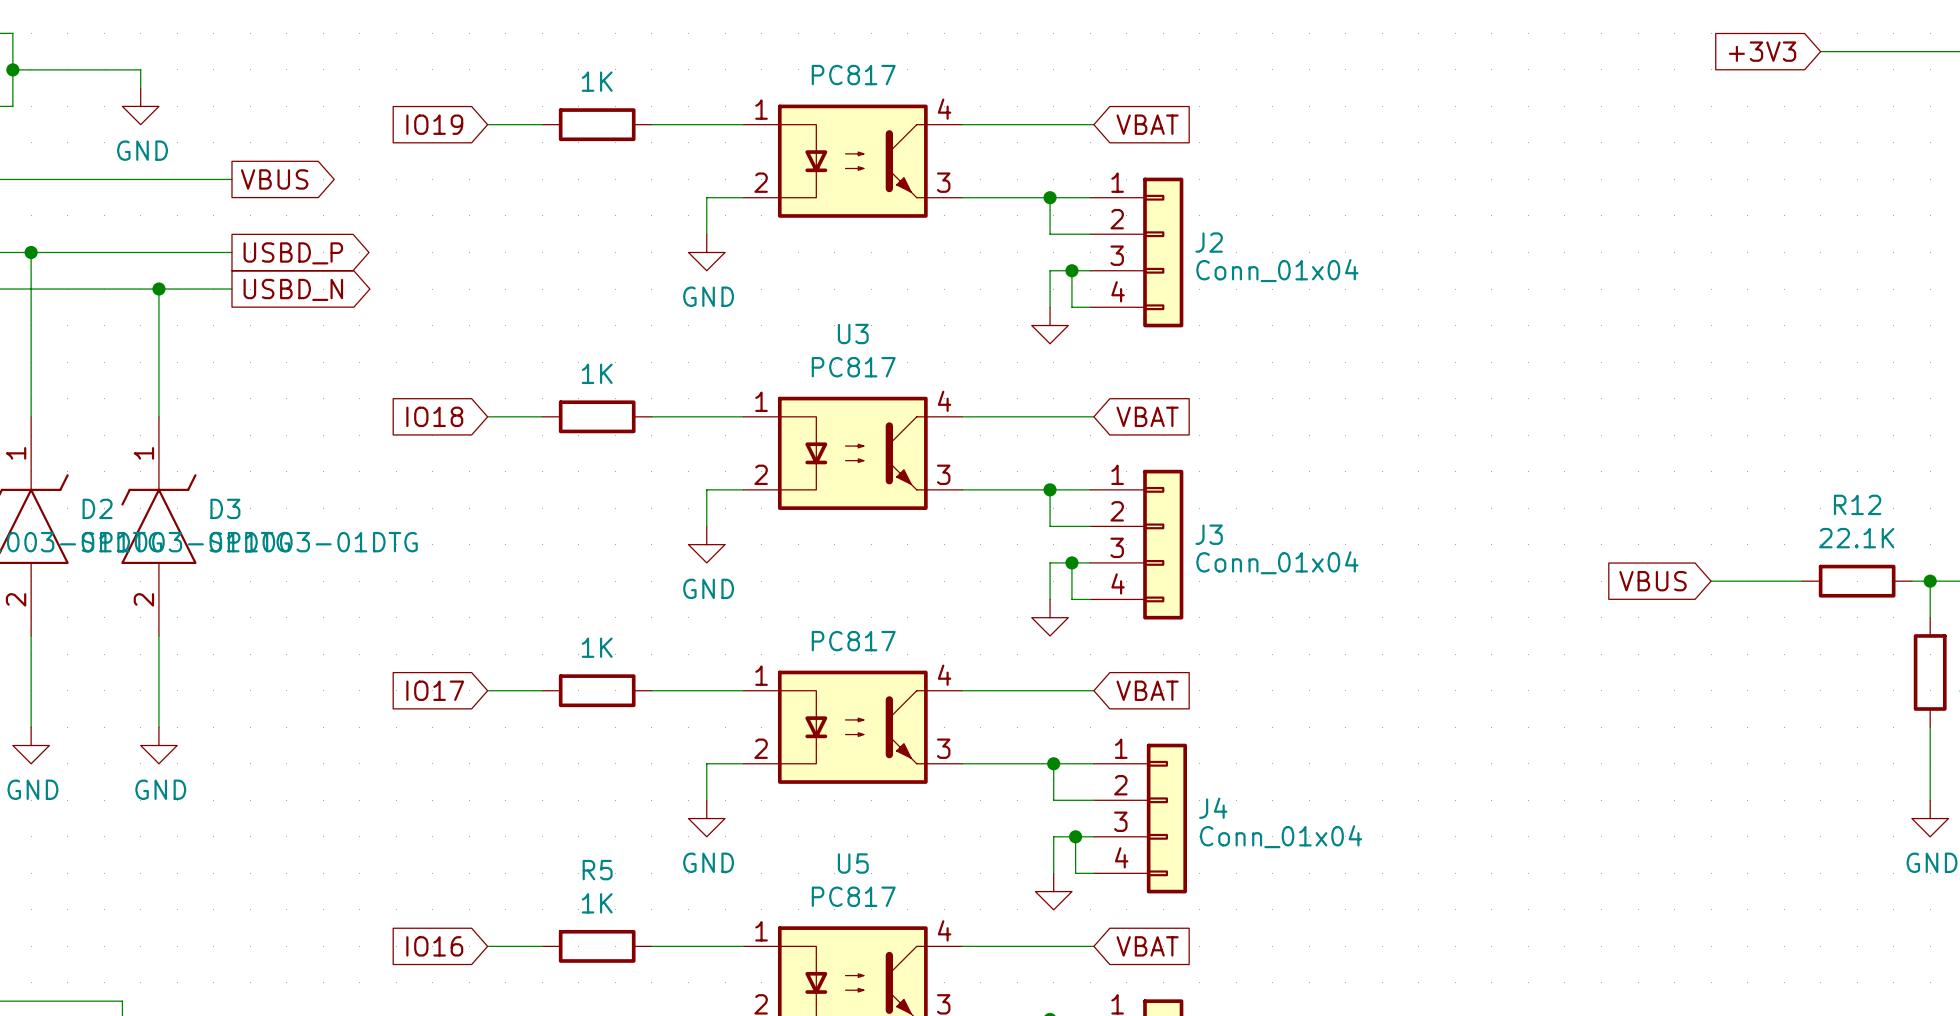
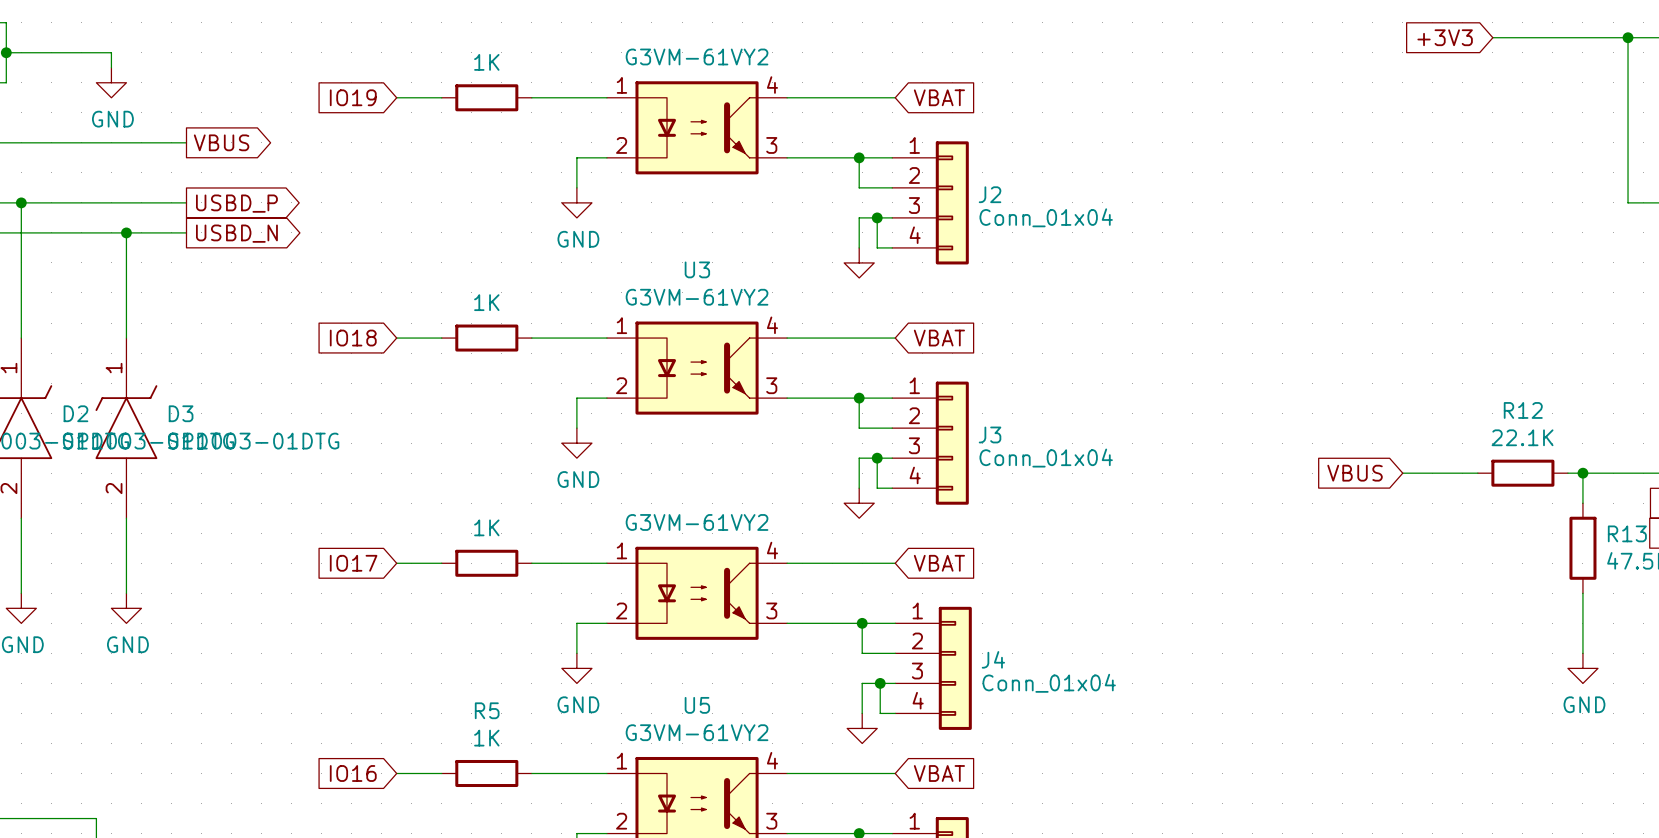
part value: PC817 (853, 75) -> G3VM-61VY2 (697, 56)
U3 value: PC817 (853, 367) -> G3VM-61VY2 (697, 297)
part value: PC817 (853, 641) -> G3VM-61VY2 (697, 522)
U5 value: PC817 (853, 896) -> G3VM-61VY2 (697, 732)

